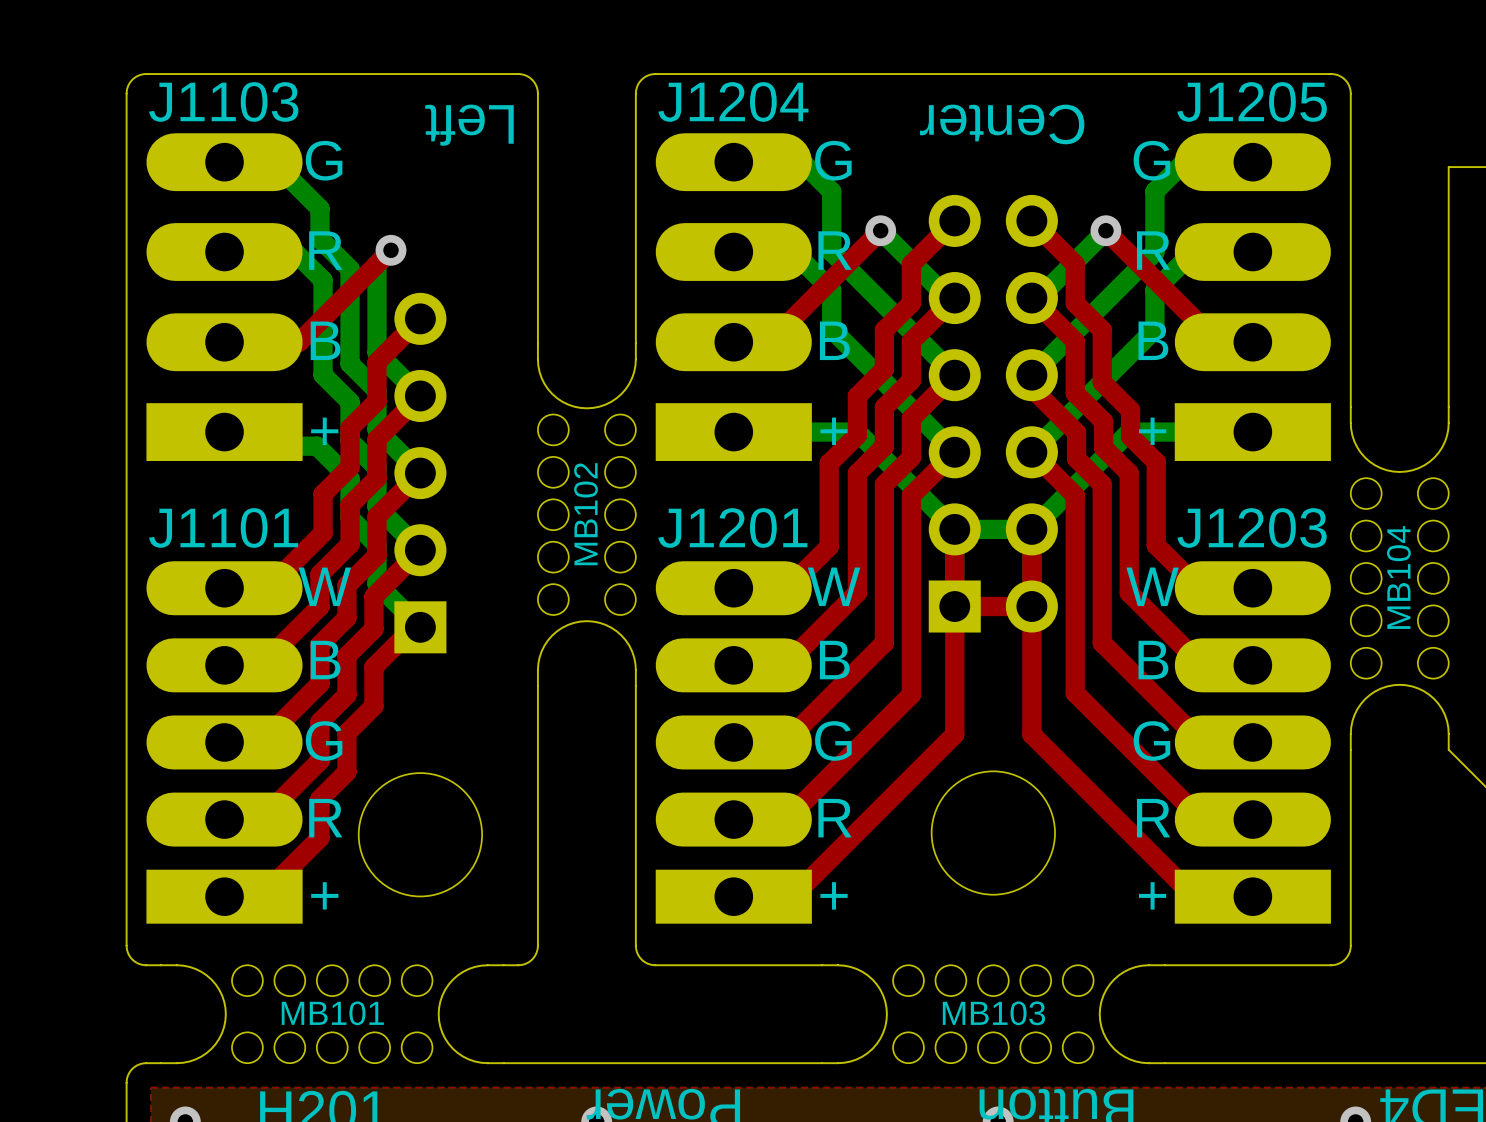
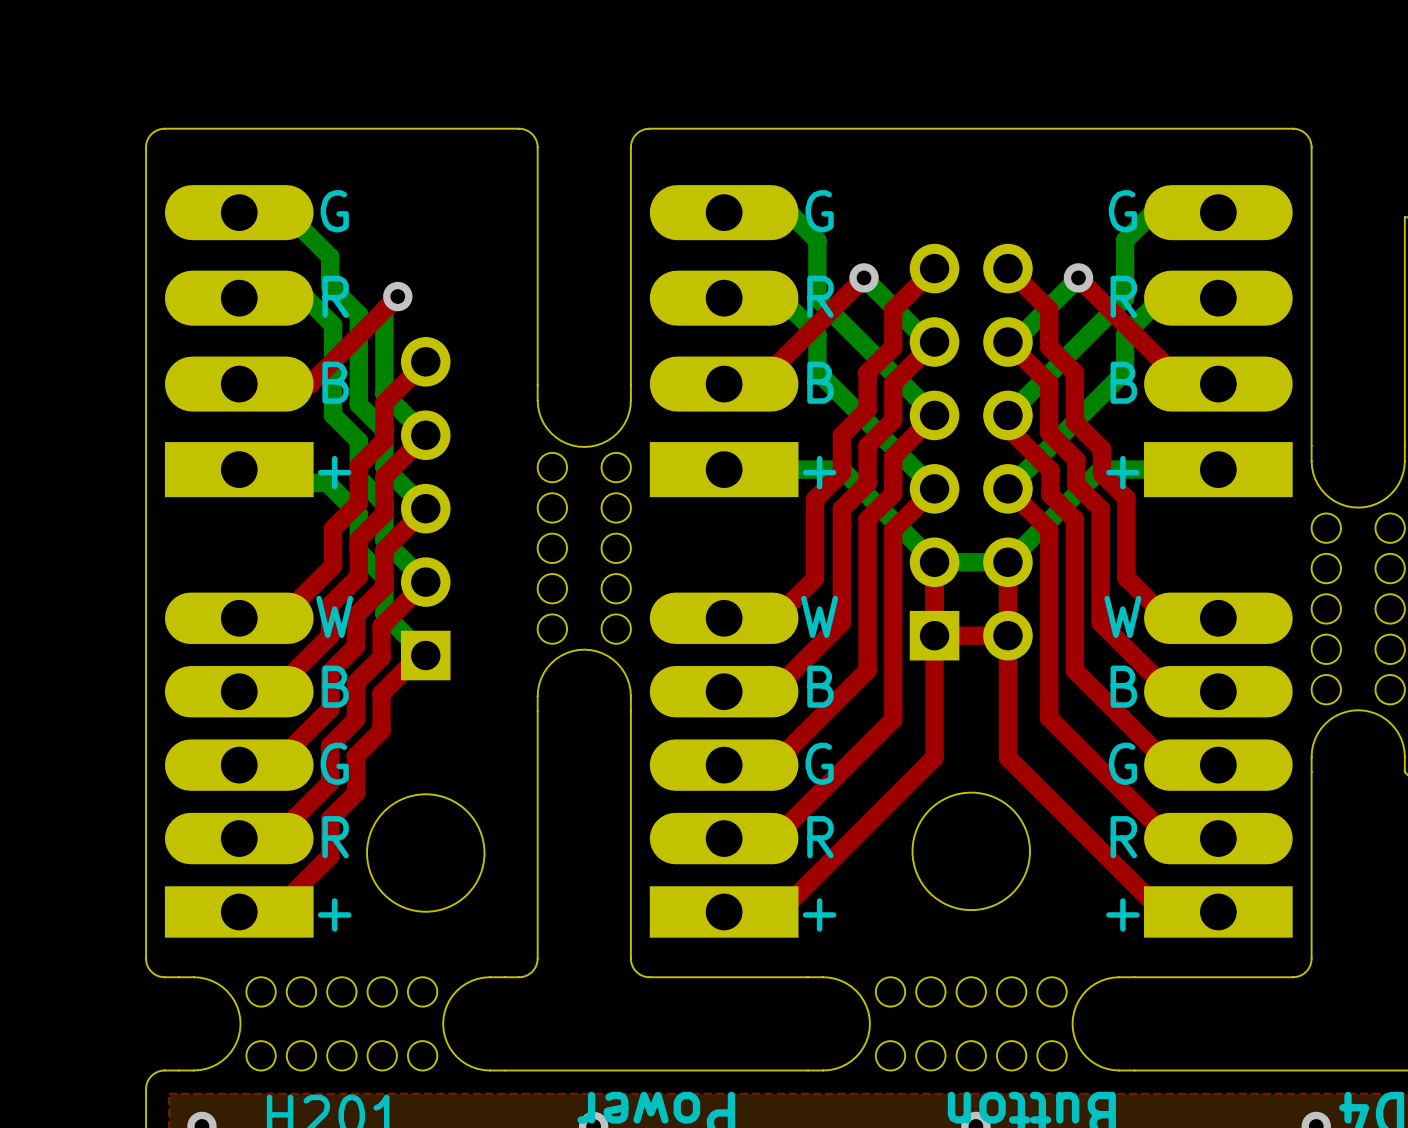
J1103 name: J1103 (223, 101) -> none
J1204 name: J1204 (733, 101) -> none
J1205 name: J1205 (1252, 101) -> none
text: Center (1002, 124) -> none
text: Left (469, 125) -> none
MB102 name: MB102 (586, 514) -> none
J1101 name: J1101 (223, 527) -> none
J1201 name: J1201 (732, 527) -> none
J1203 name: J1203 (1252, 527) -> none
MB104 name: MB104 (1398, 577) -> none
MB101 name: MB101 (332, 1013) -> none
MB103 name: MB103 (993, 1013) -> none

